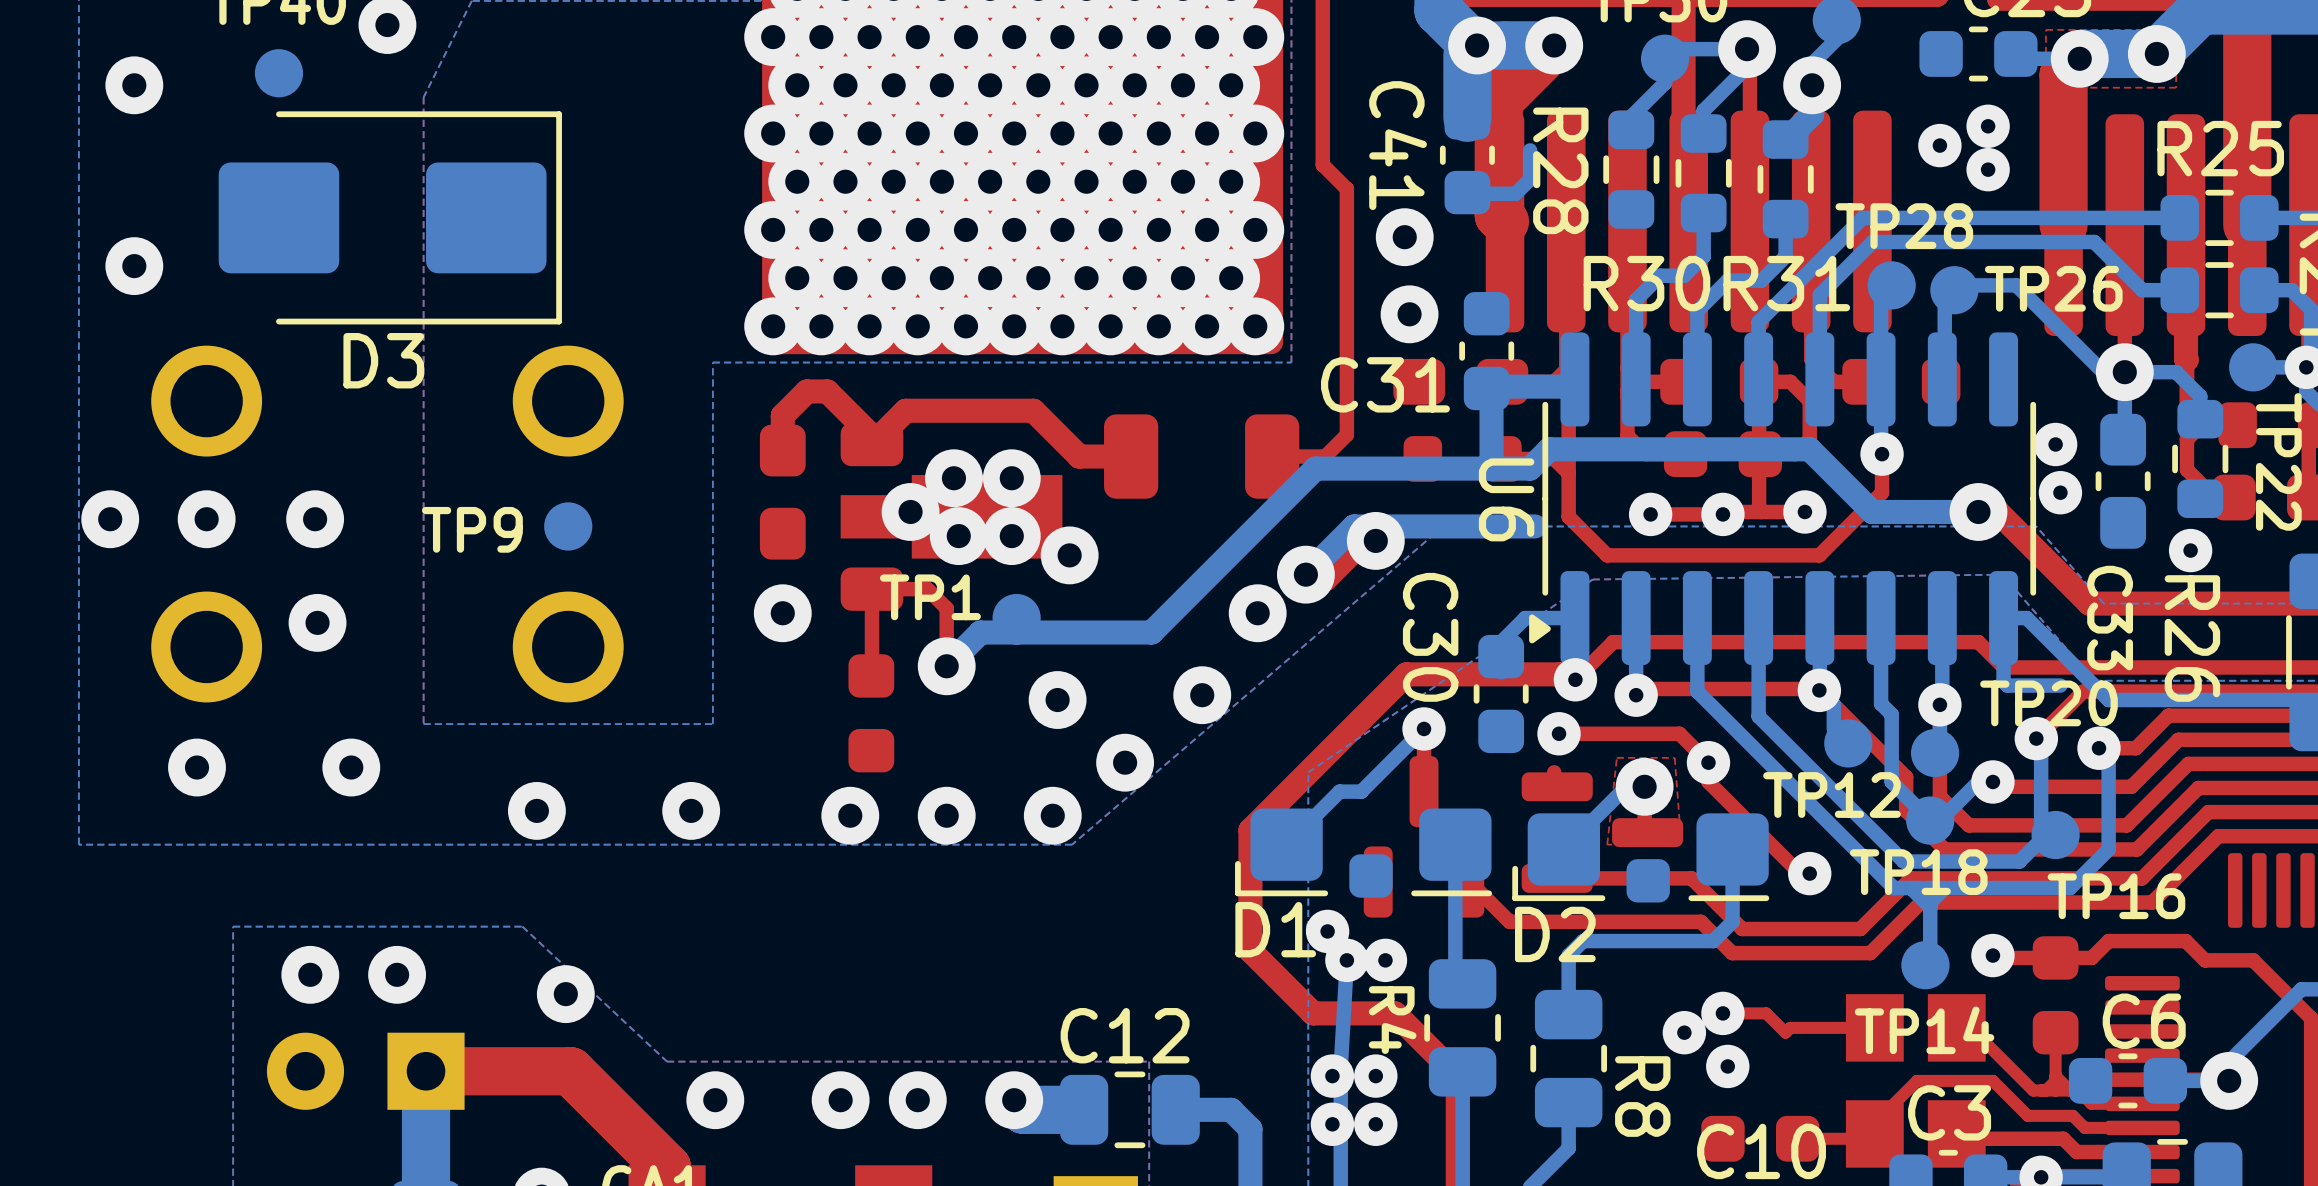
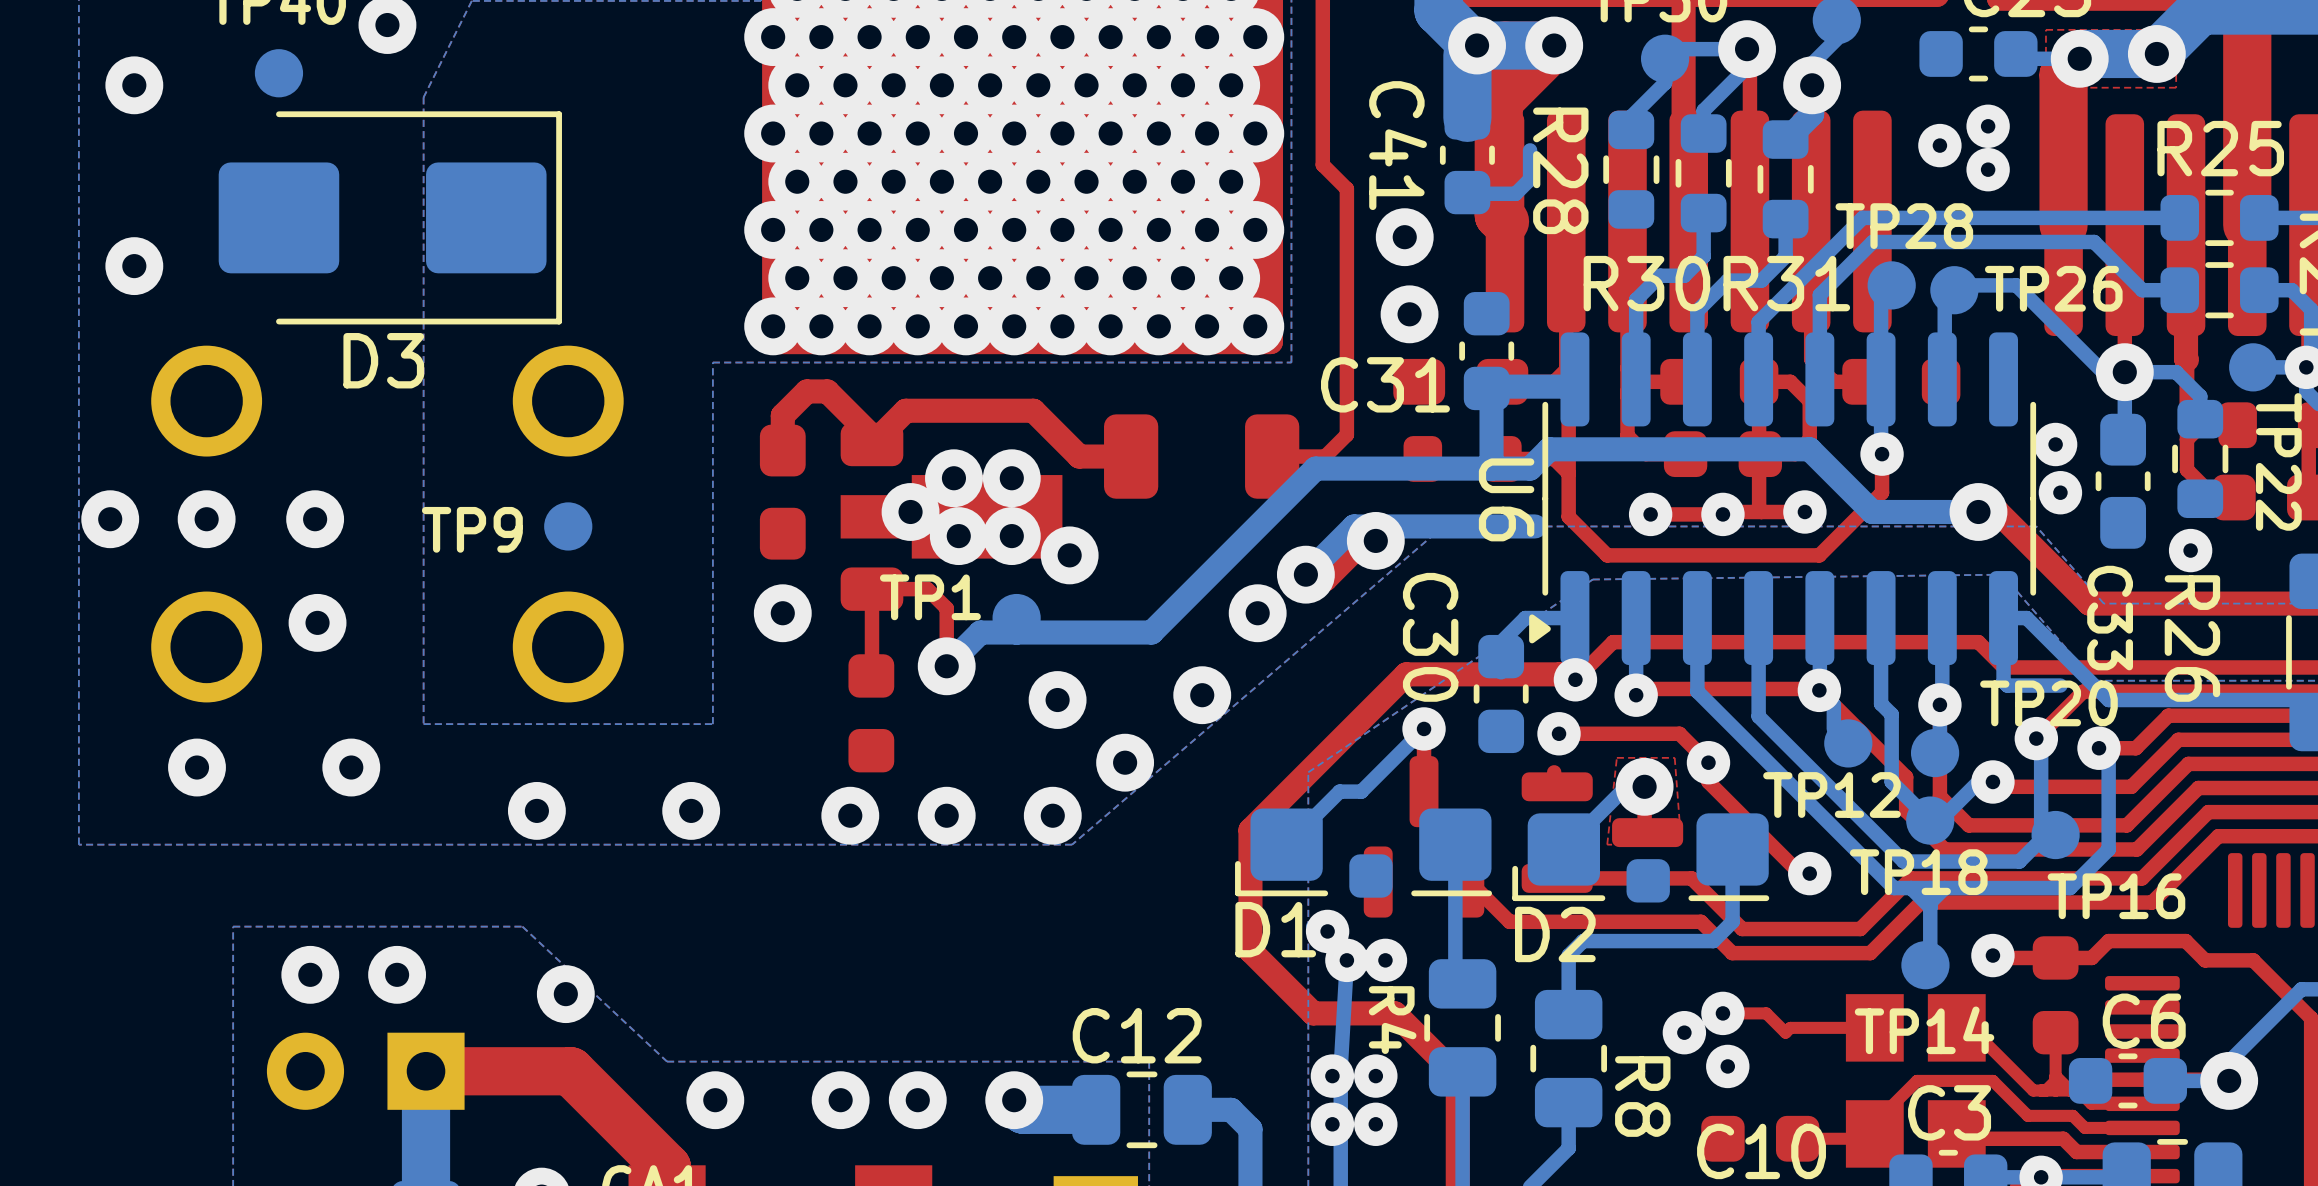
C12 position: (1129, 1109) -> (1141, 1109)

